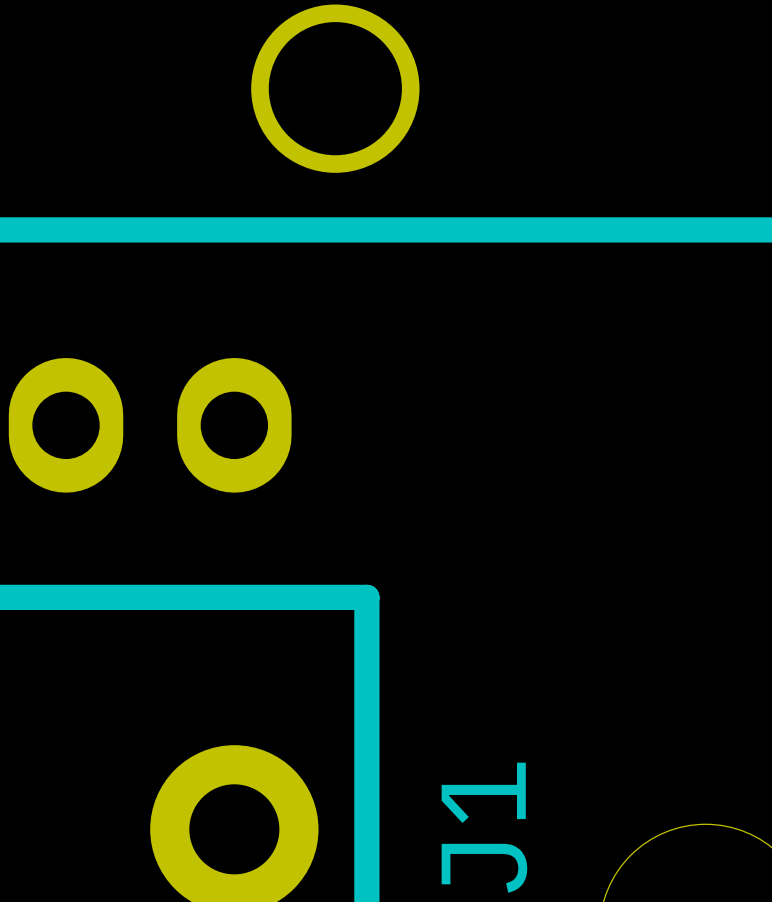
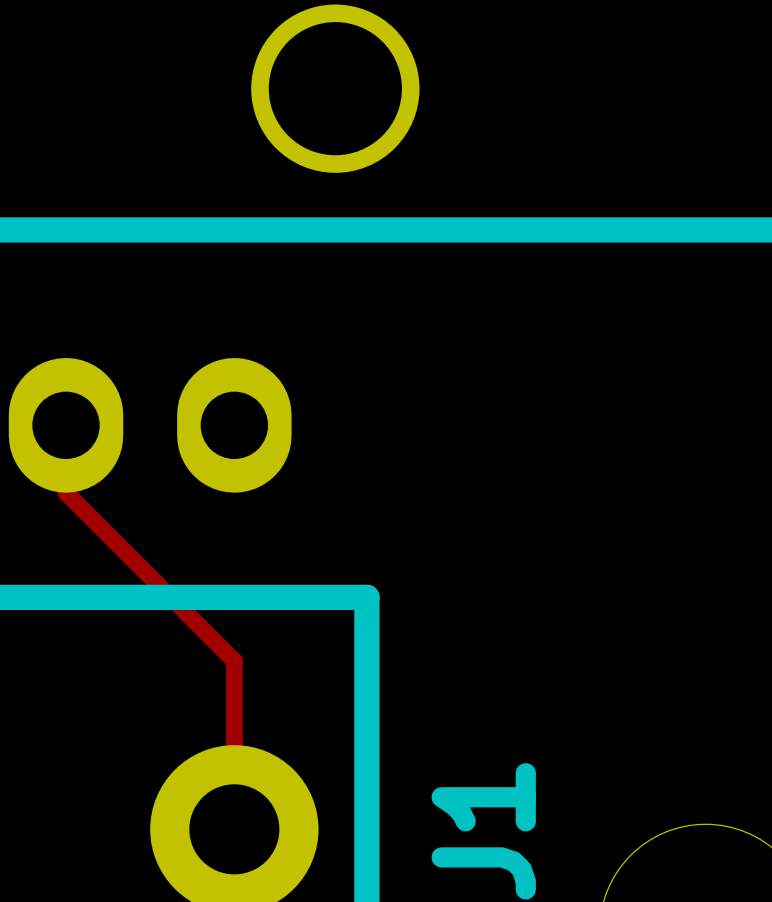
track: none -> (66, 425) (66, 492) (234, 661) (234, 829)

